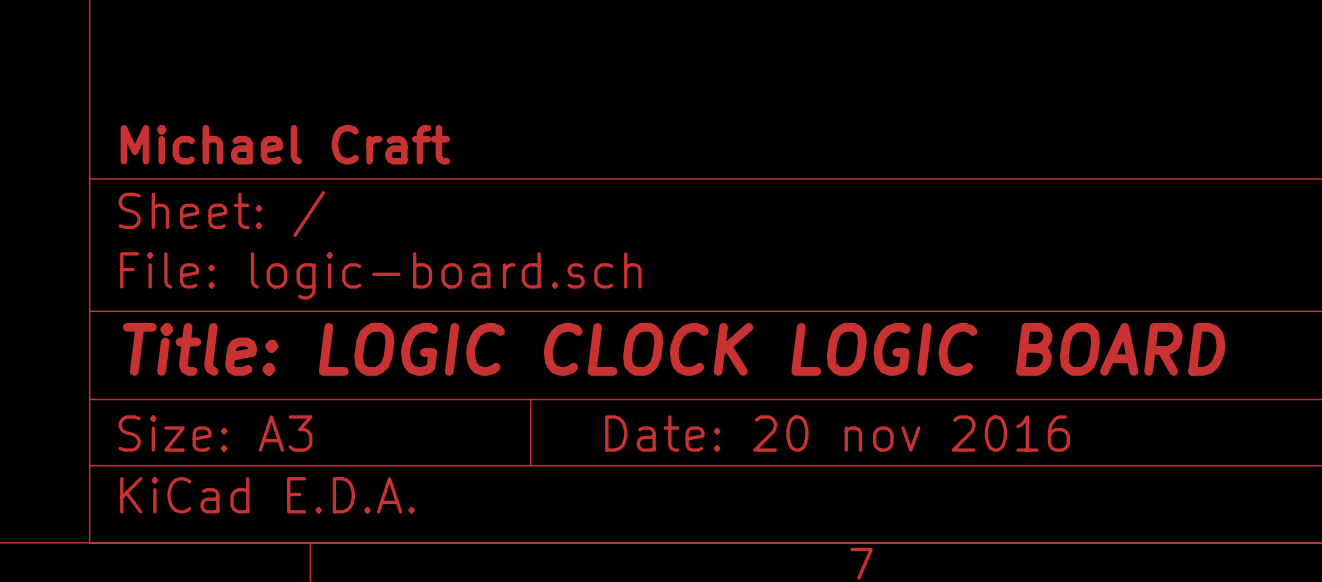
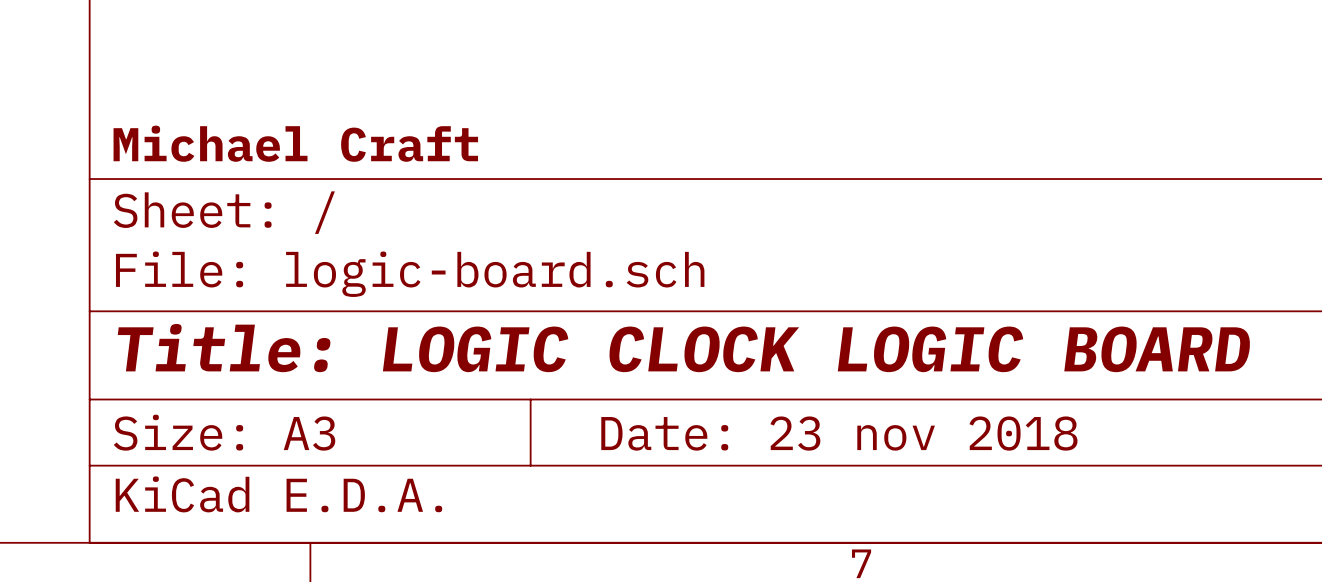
title block: Date: 20 nov 2016 (837, 433) -> Date: 23 nov 2018 (839, 433)

